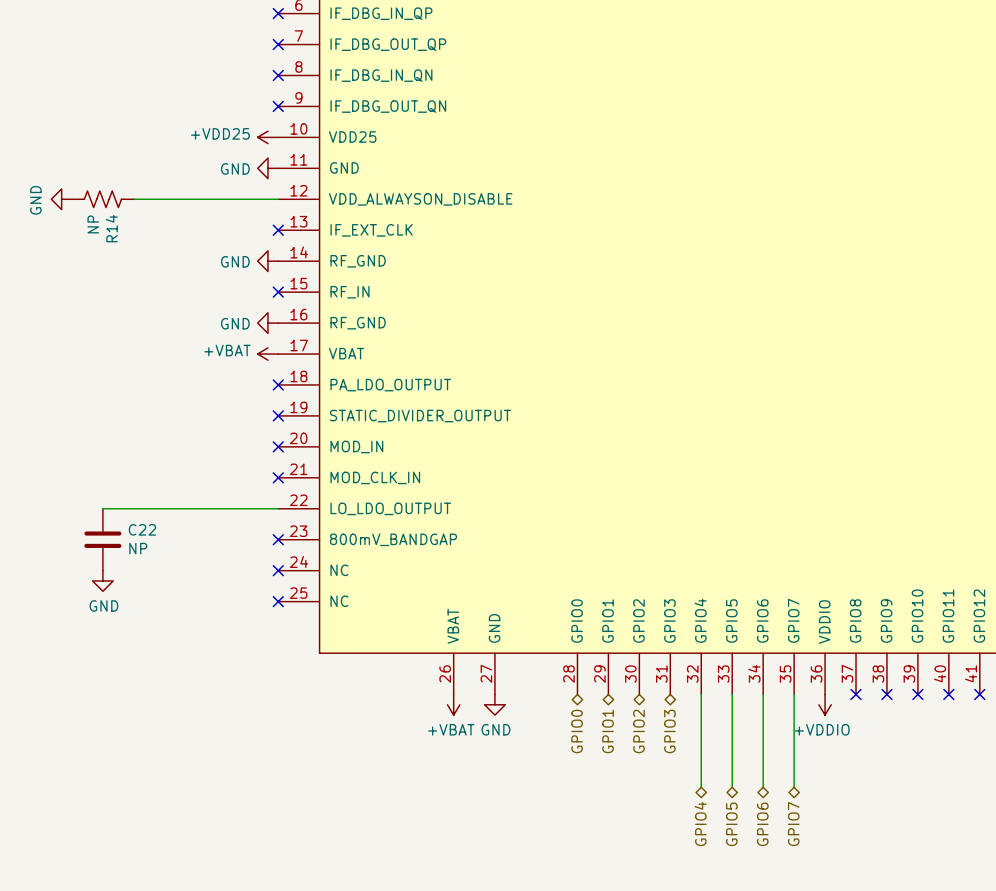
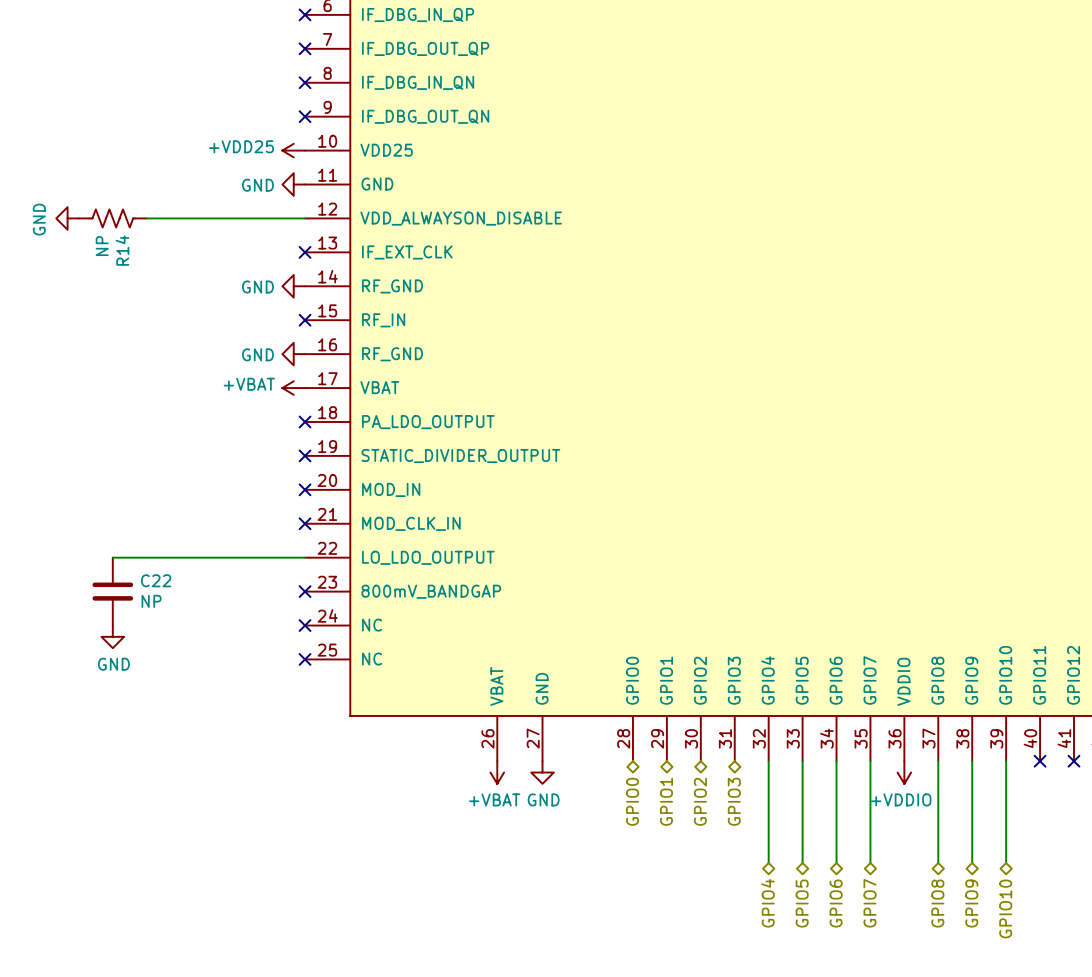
wire: none -> (938, 761) (938, 862)
no-connect mark: (856, 694) -> none
wire: none -> (972, 761) (972, 862)
no-connect mark: (886, 694) -> none
wire: none -> (1006, 761) (1006, 862)
no-connect mark: (917, 694) -> none
hierarchical label: none -> GPIO8 (937, 903)
hierarchical label: none -> GPIO9 (971, 903)
hierarchical label: none -> GPIO10 (1005, 908)

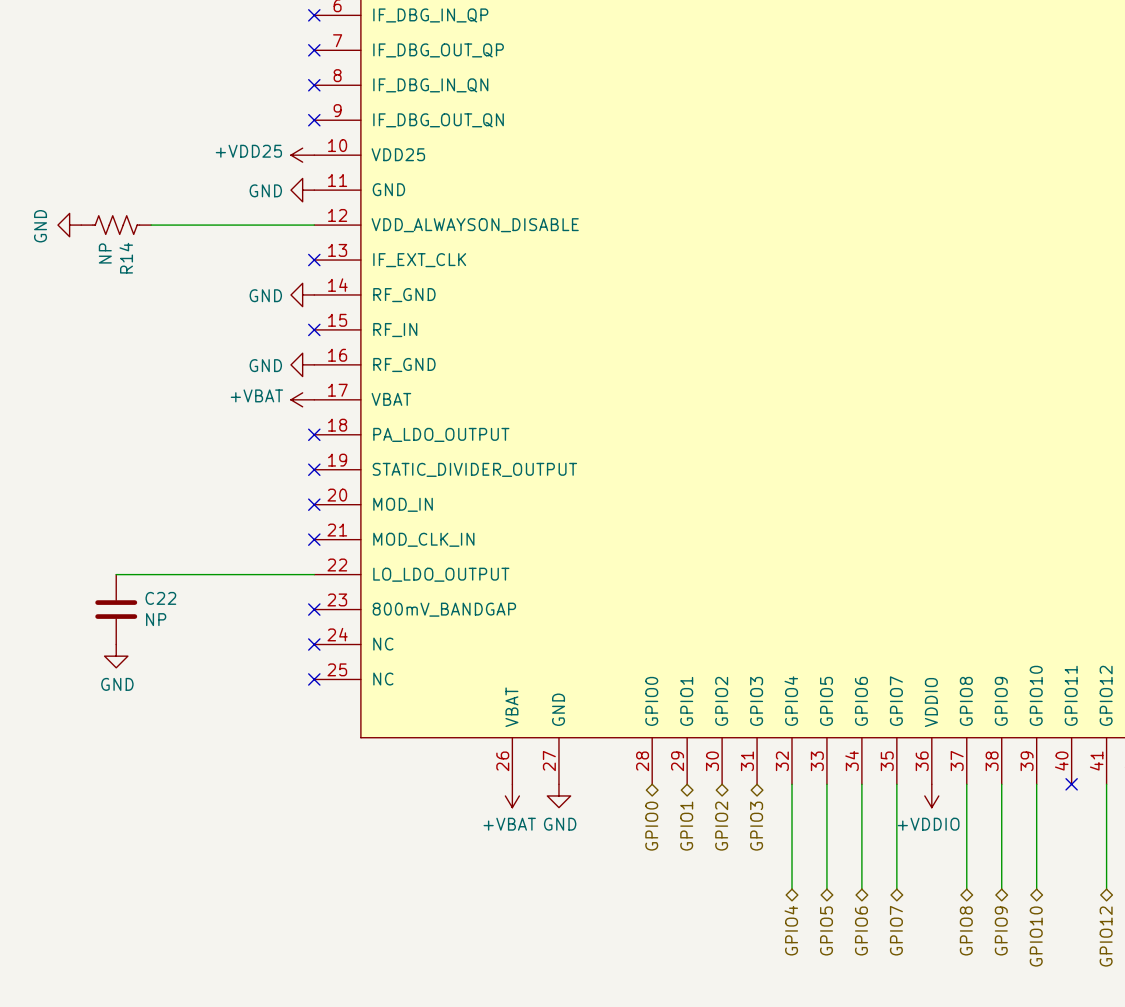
wire: none -> (1106, 784) (1106, 889)
no-connect mark: (1073, 761) -> none
hierarchical label: none -> GPIO12 (1106, 936)

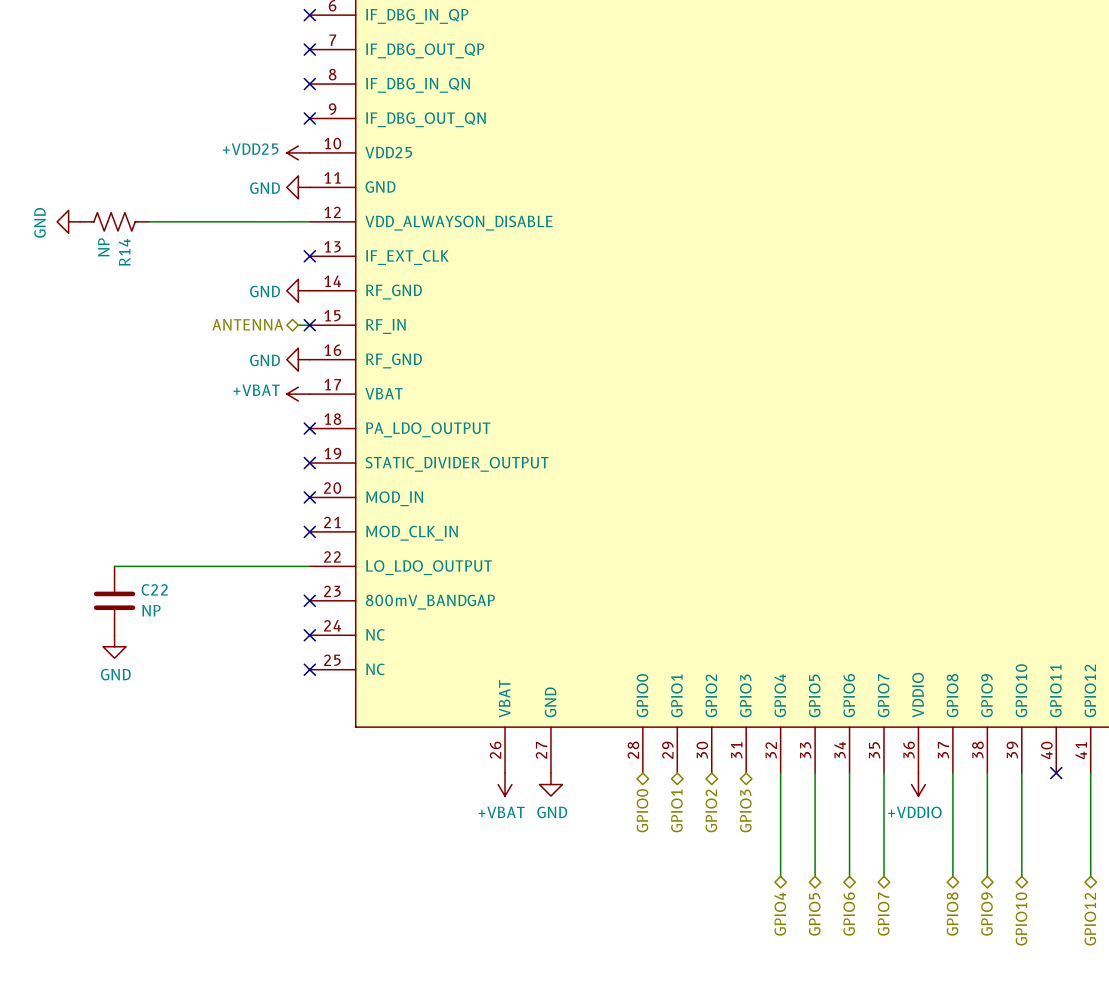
hierarchical label: none -> ANTENNA (247, 324)
wire: none -> (298, 325) (309, 325)

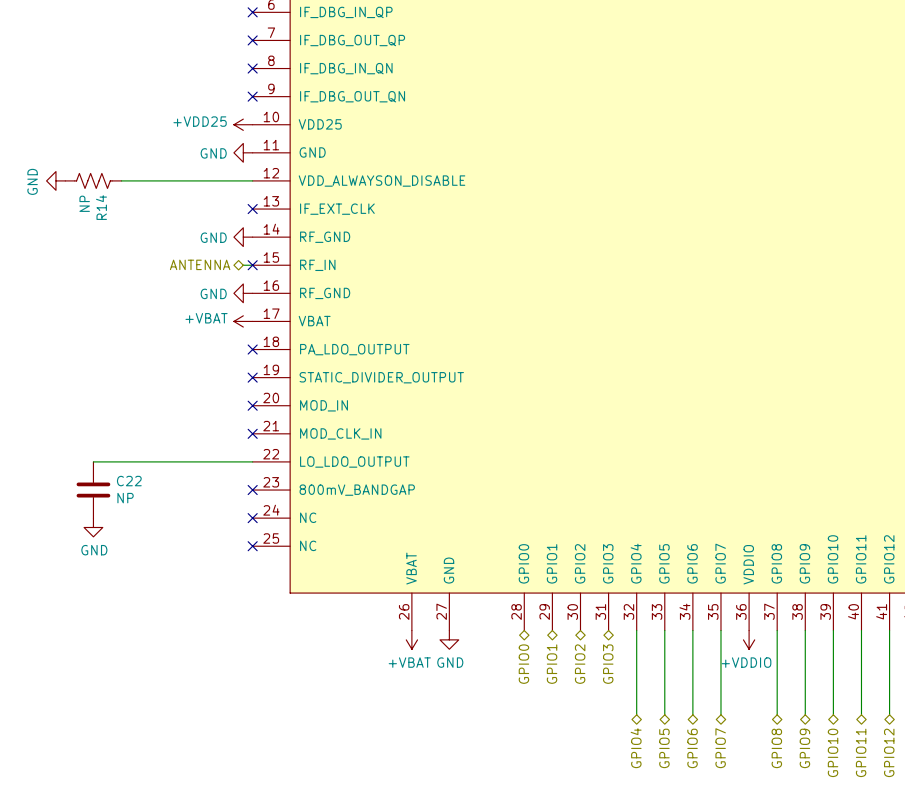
wire: none -> (861, 630) (861, 714)
no-connect mark: (1056, 773) -> none
hierarchical label: none -> GPIO11 (861, 752)

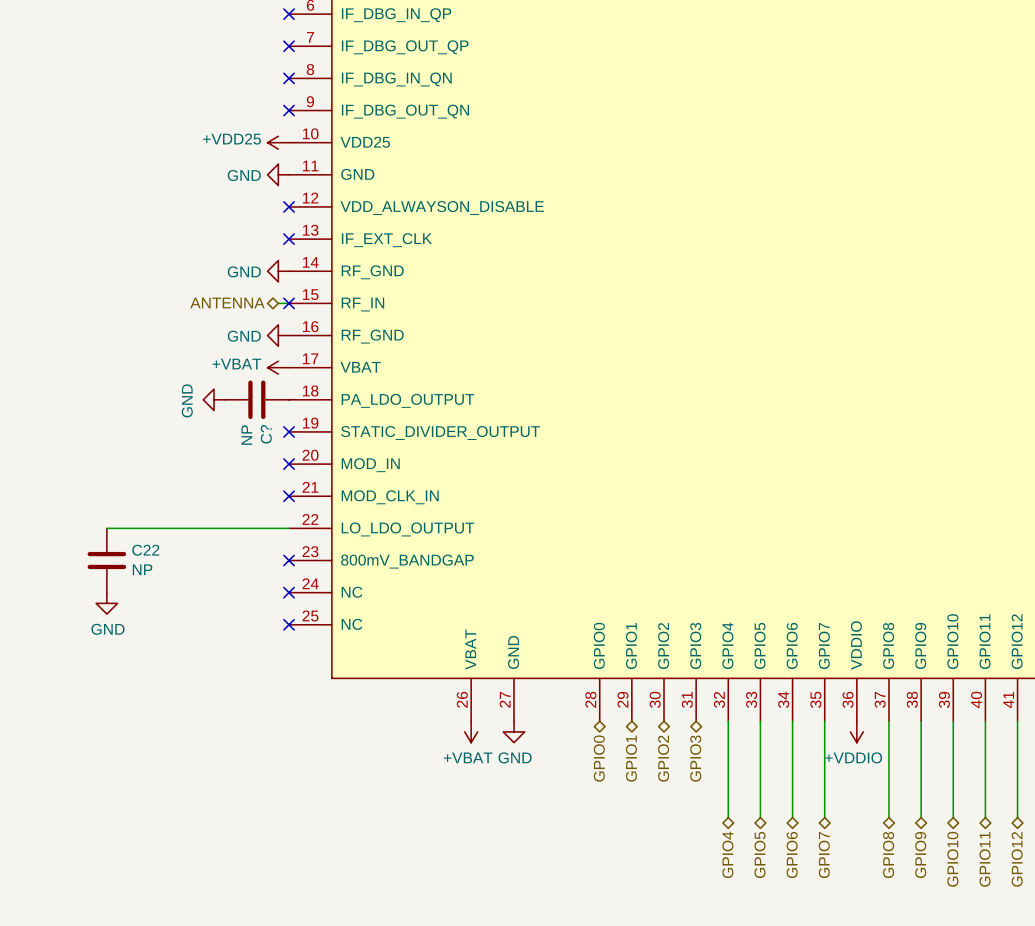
power symbol: GND (55, 180) -> none
R14: NP (93, 180) -> none
wire: (121, 180) (252, 180) -> none
no-connect mark: none -> (289, 206)
power symbol: none -> GND (214, 399)
C?: none -> NP (256, 399)
no-connect mark: (252, 349) -> none

